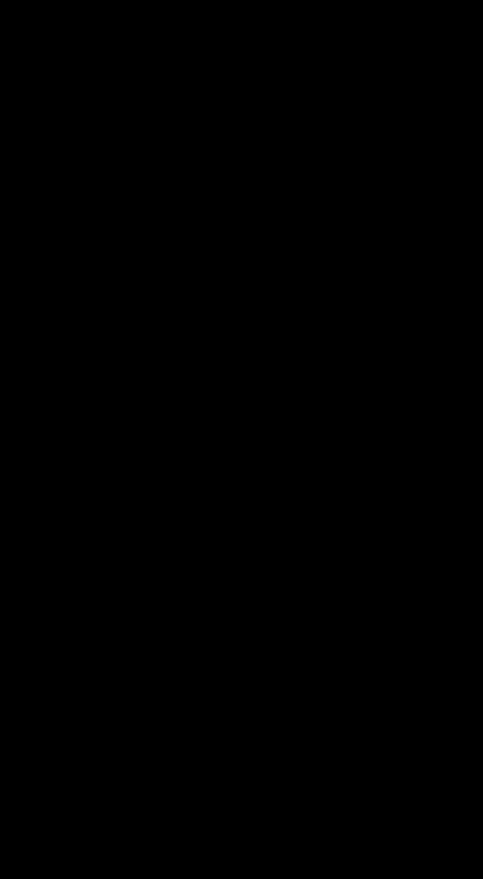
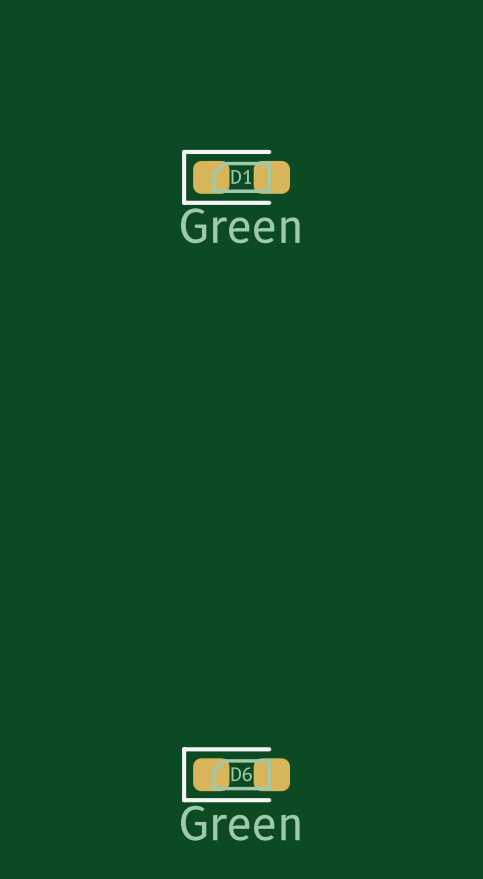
D1: none -> Green (236, 177)
D6: none -> Green (236, 774)

